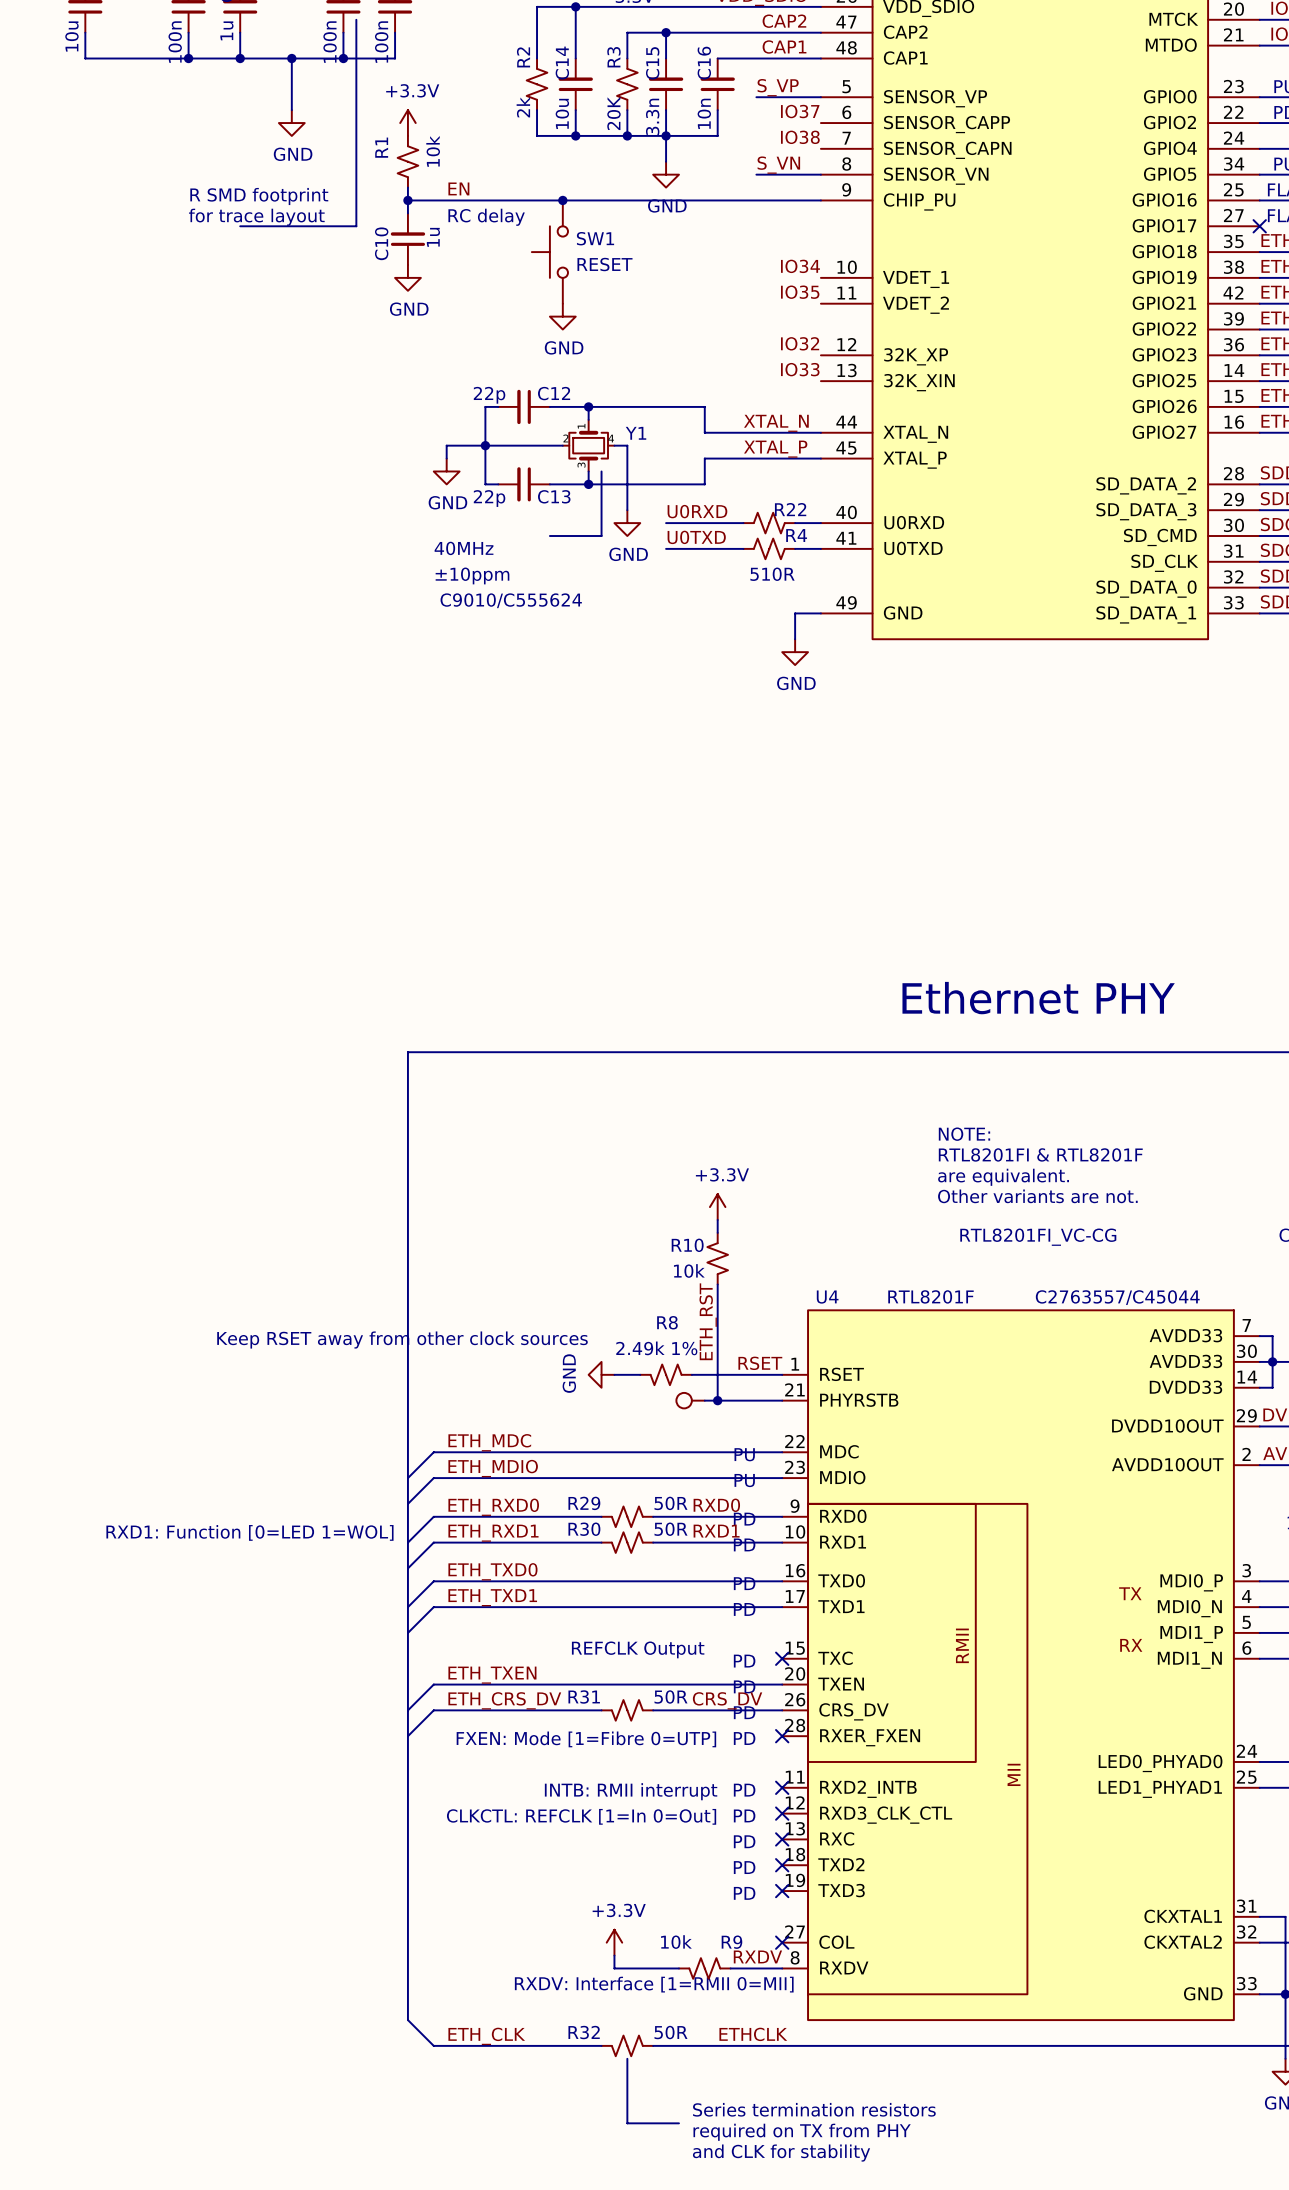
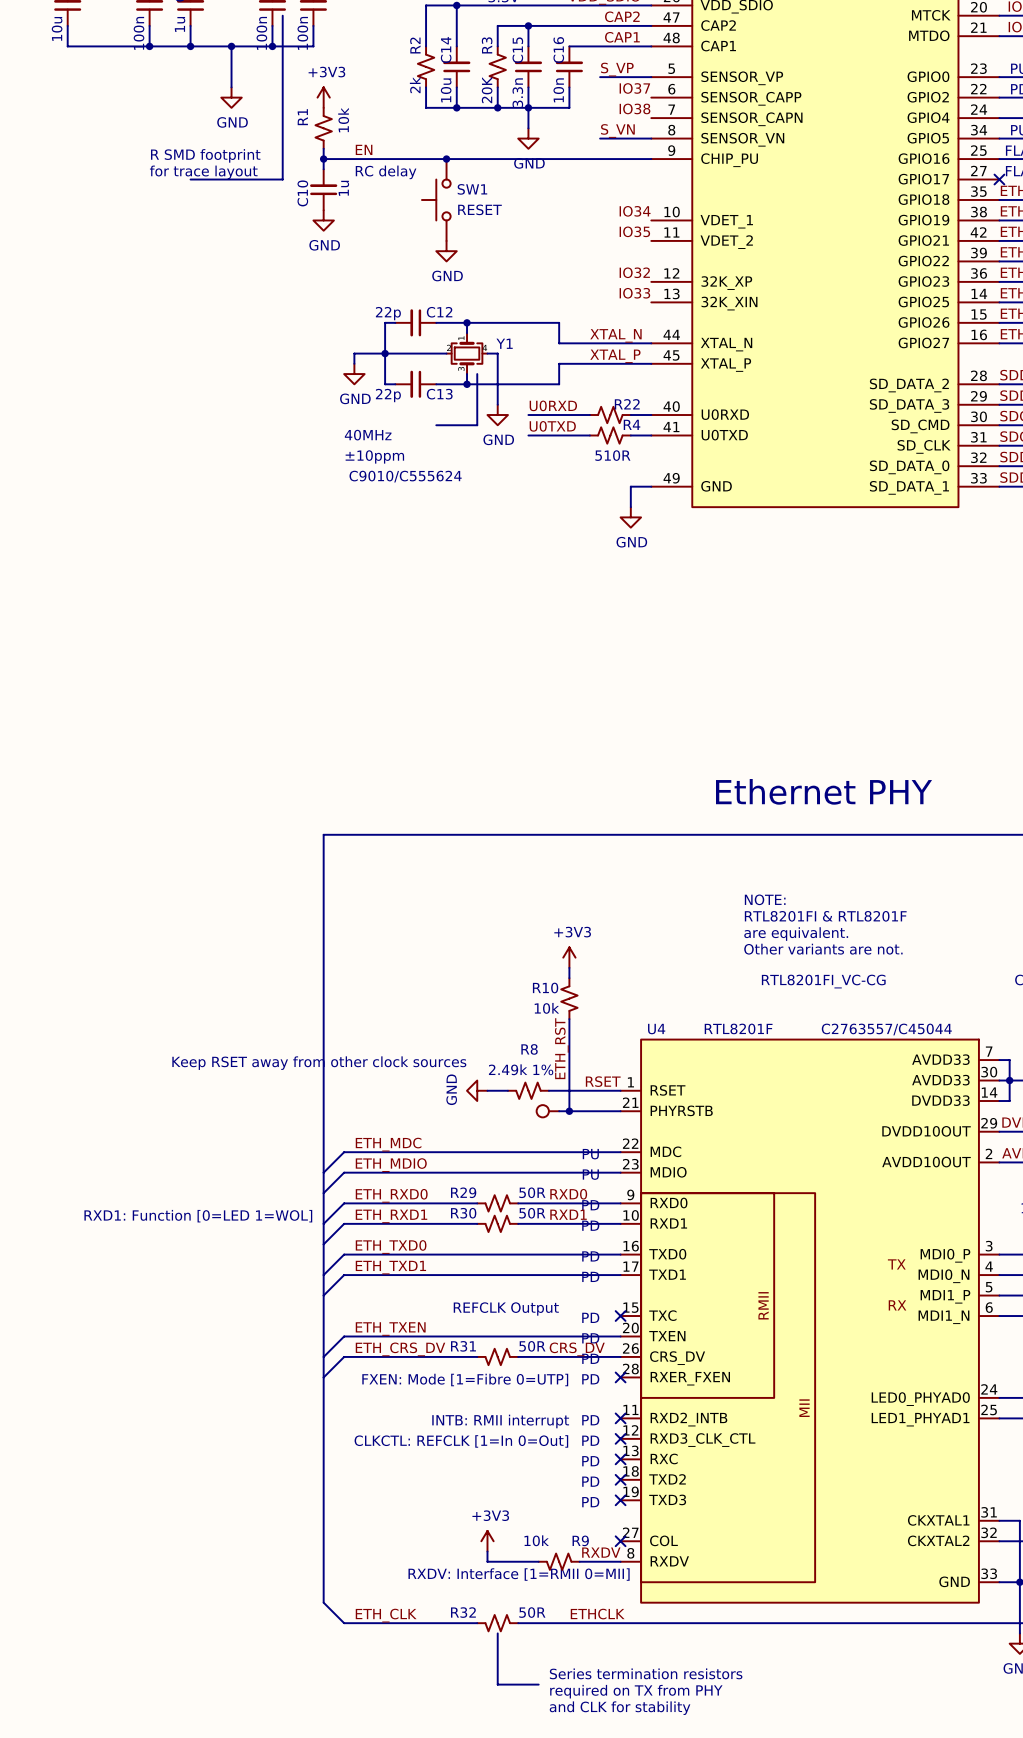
power symbol: +3.3V (407, 123) -> +3V3 (323, 97)
power symbol: +3.3V (717, 1207) -> +3V3 (569, 957)
power symbol: +3.3V (614, 1942) -> +3V3 (487, 1541)

